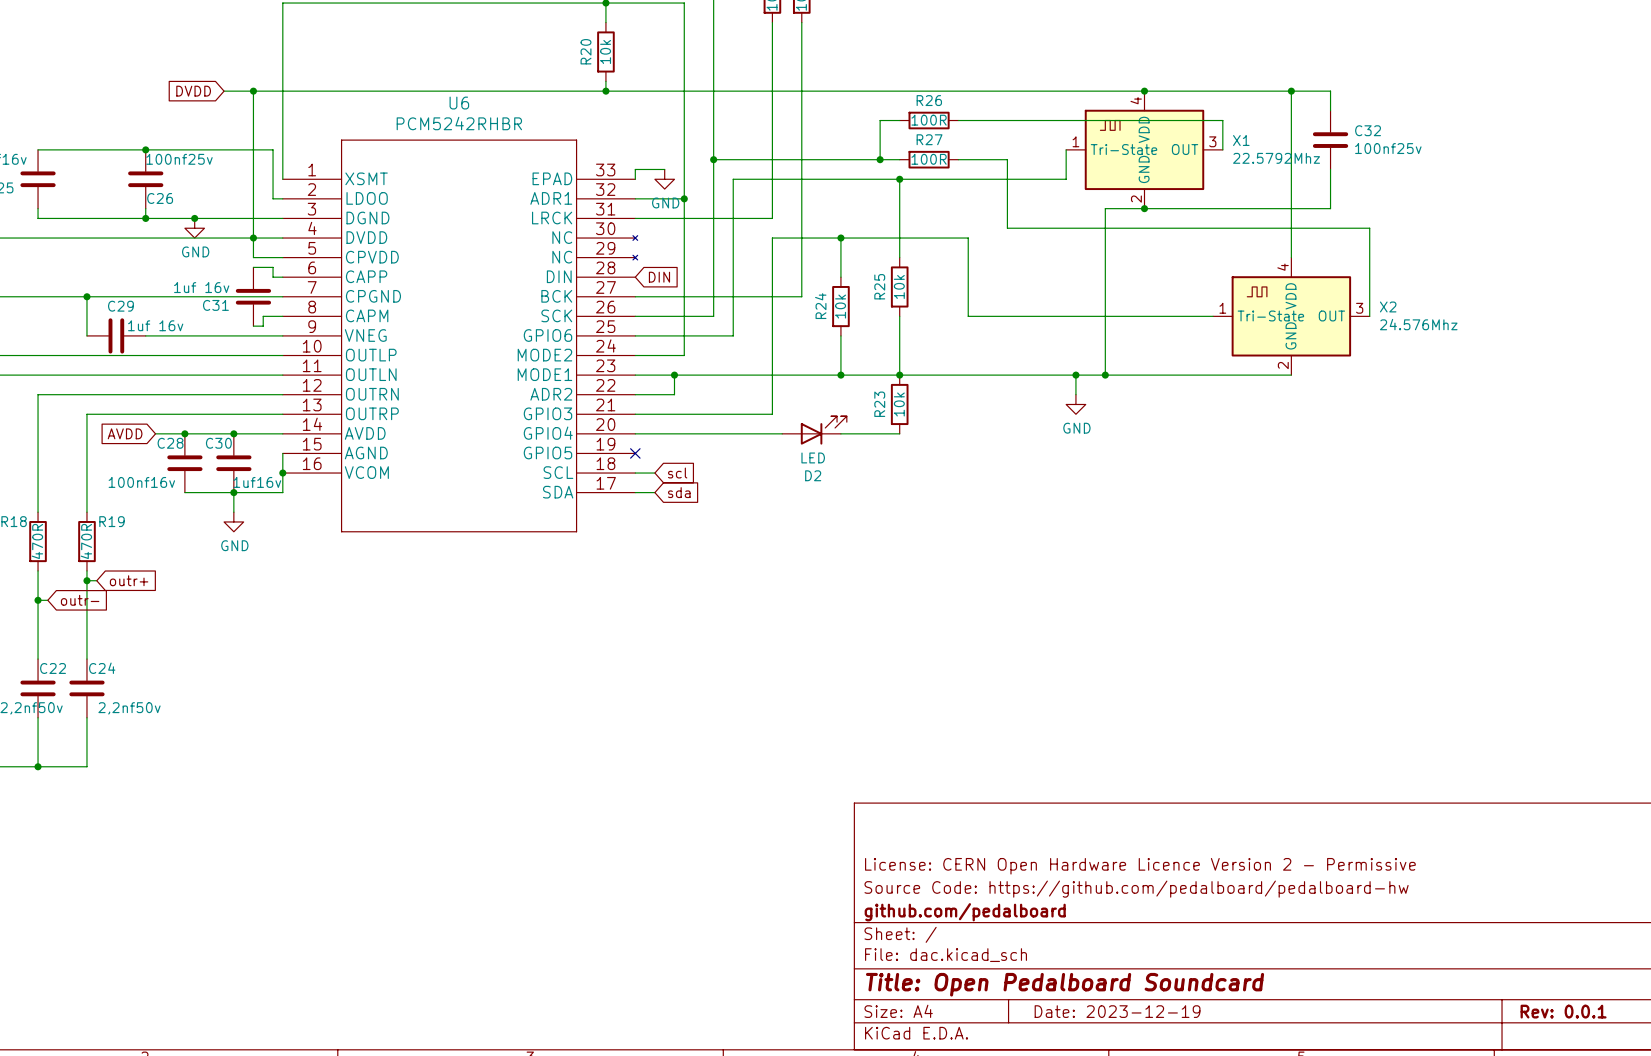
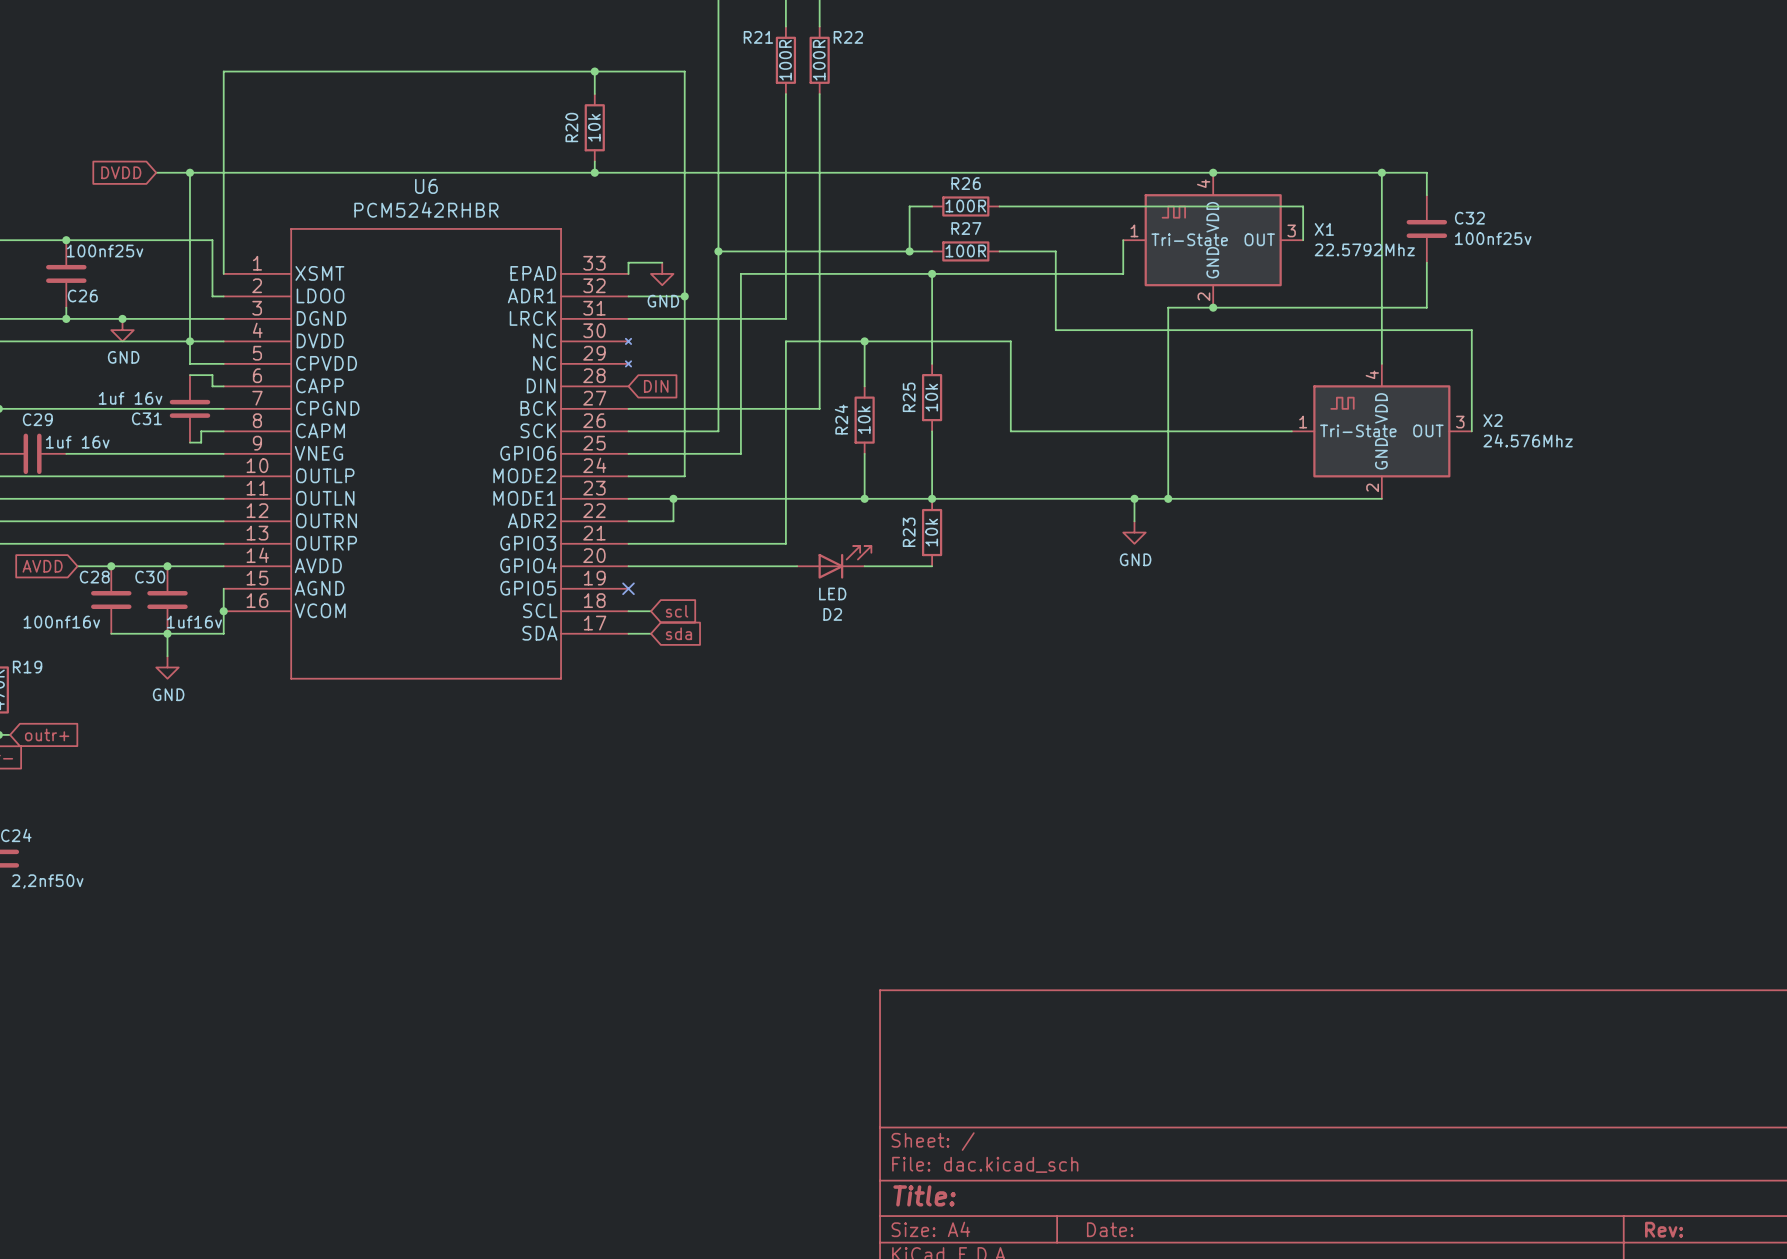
title block: License: CERN Open Hardware Licence Version 2 - Permissive (1140, 866) -> none
title block: Source Code: https://github.com/pedalboard/pedalboard-hw (1136, 889) -> none
title block: github.com/pedalboard (965, 912) -> none
title block: Title: Open Pedalboard Soundcard (1065, 984) -> Title: (924, 1195)
title block: Date: 2023-12-19 (1117, 1011) -> Date: (1110, 1229)
title block: Rev: 0.0.1 (1563, 1011) -> Rev: (1664, 1229)

